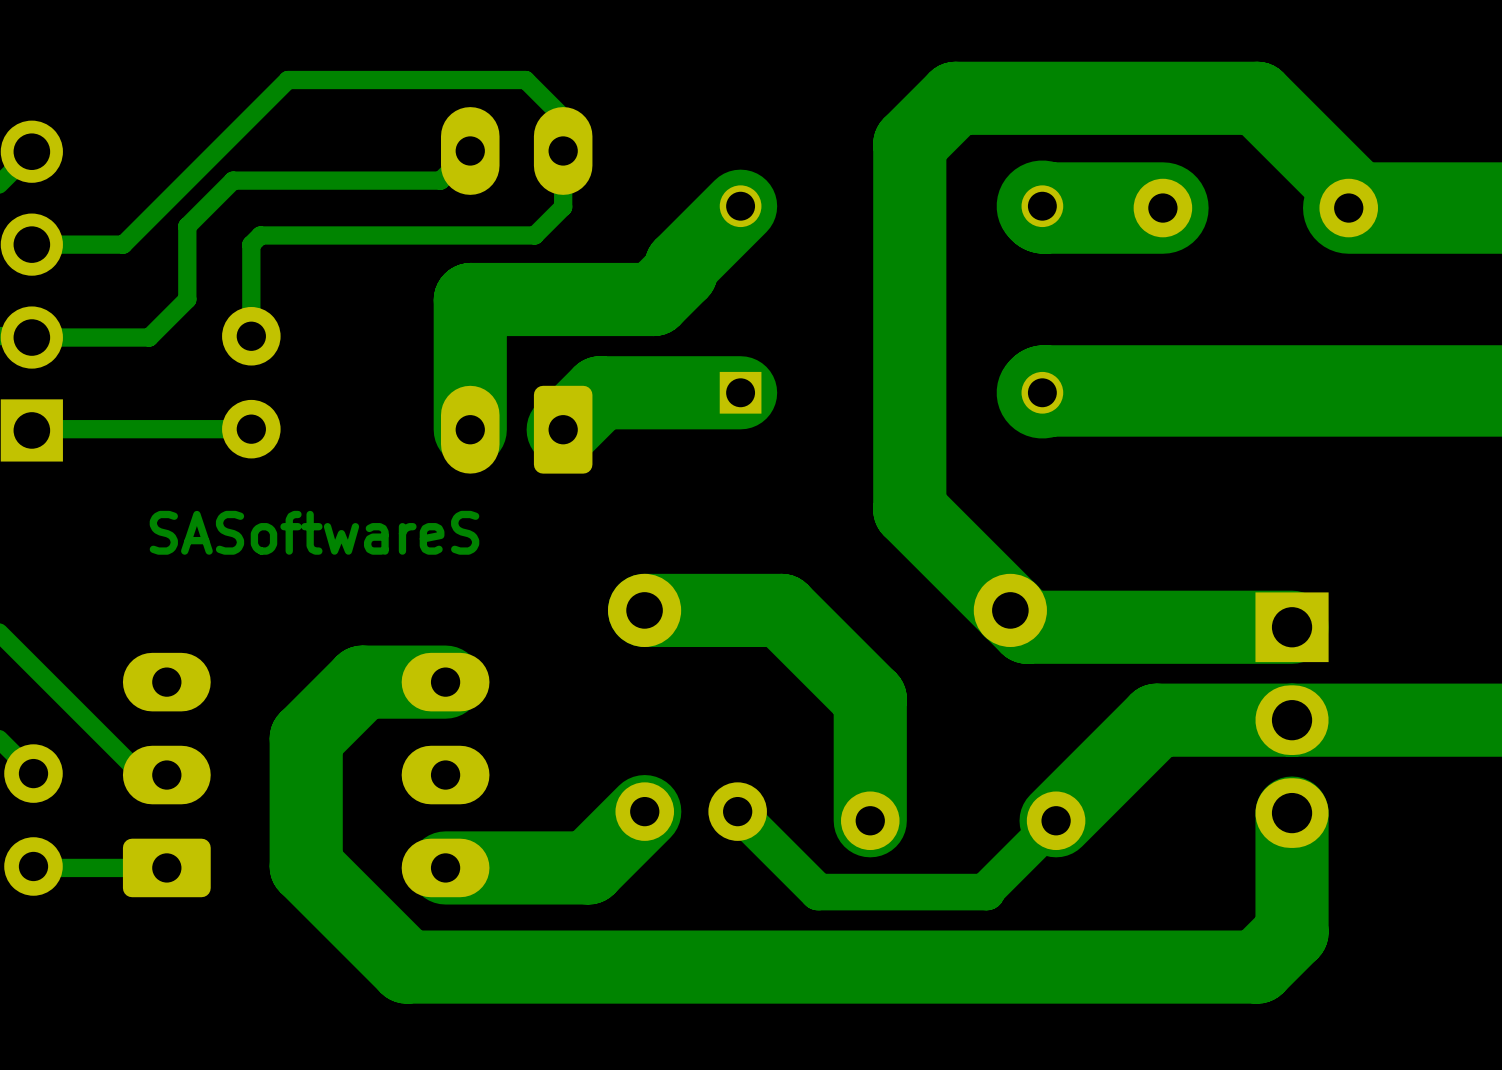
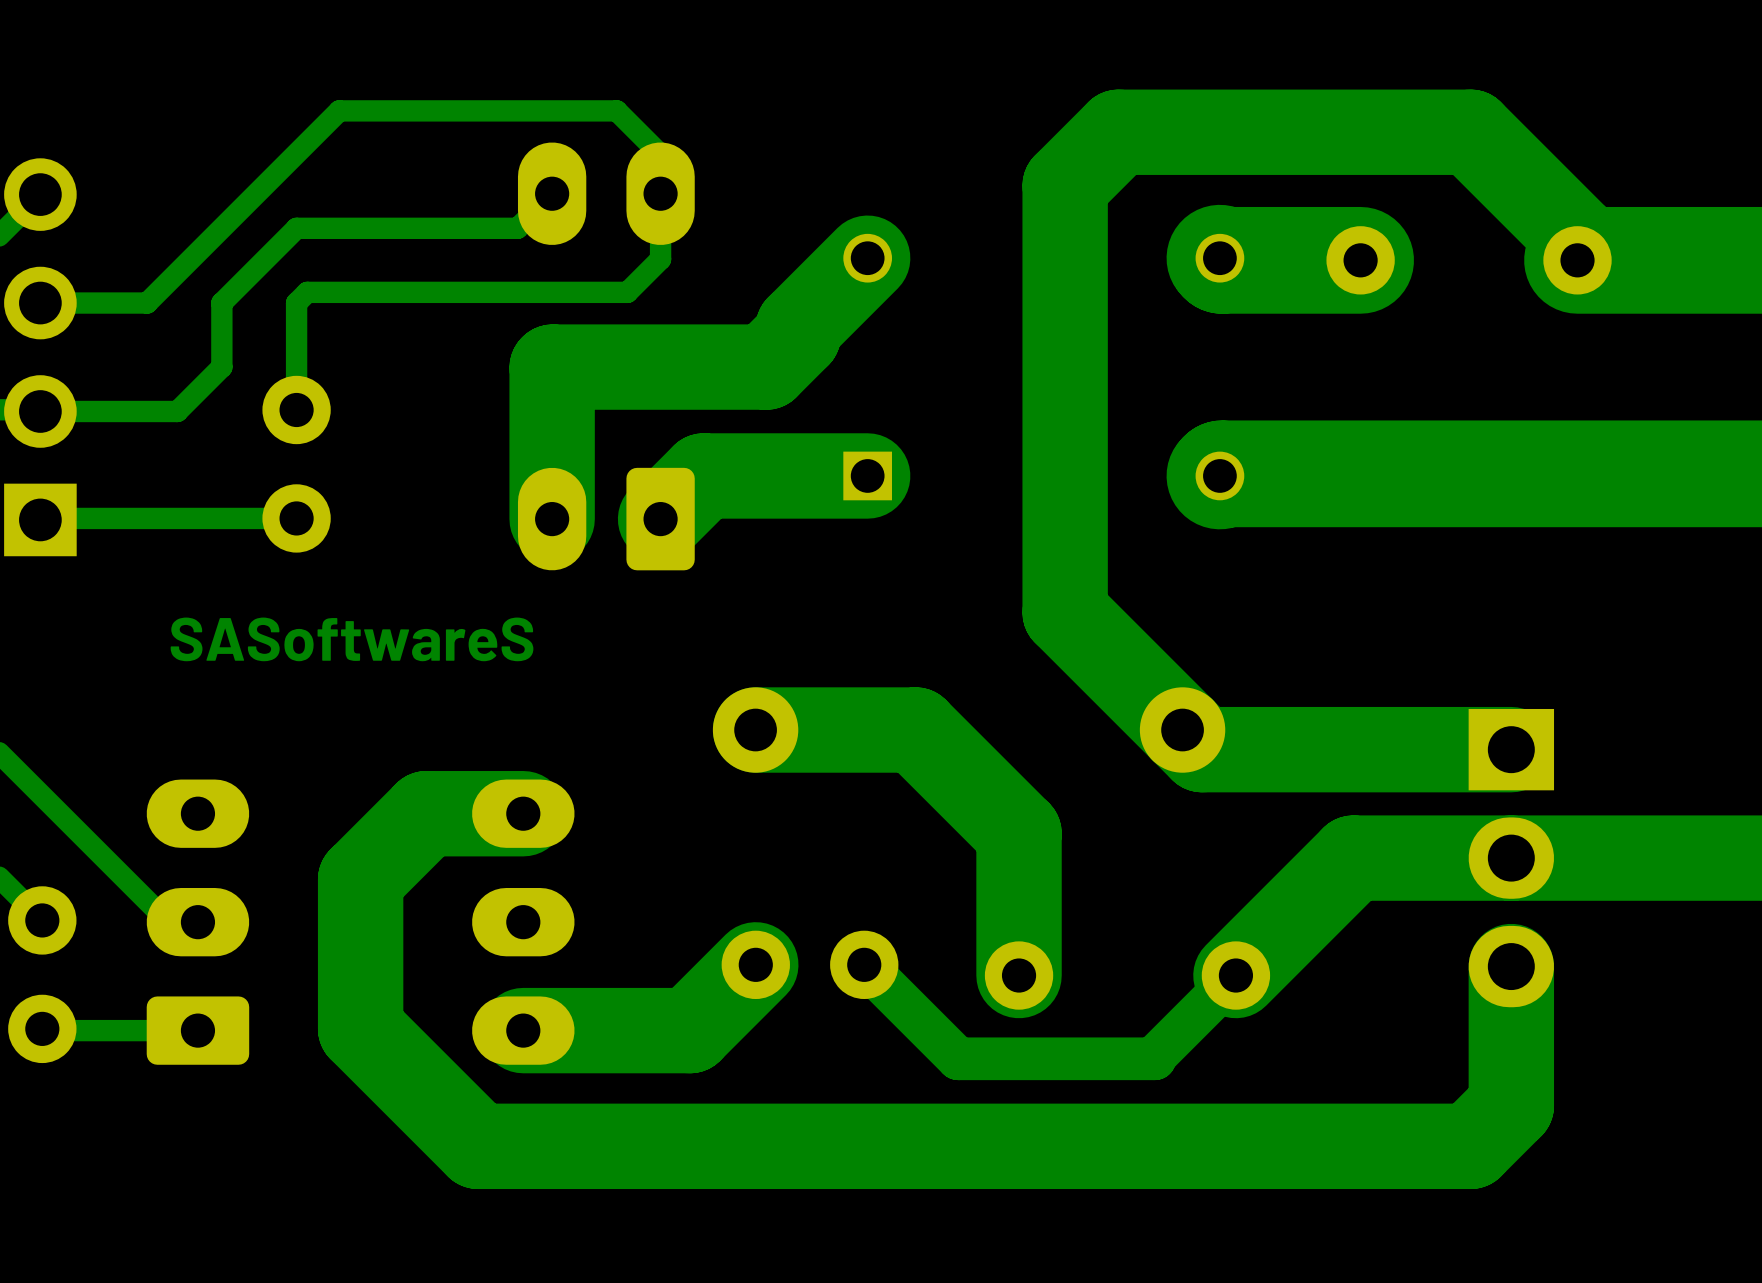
track: (251, 180) (233, 180) (187, 226) (187, 244) -> (296, 228) (221, 303)

